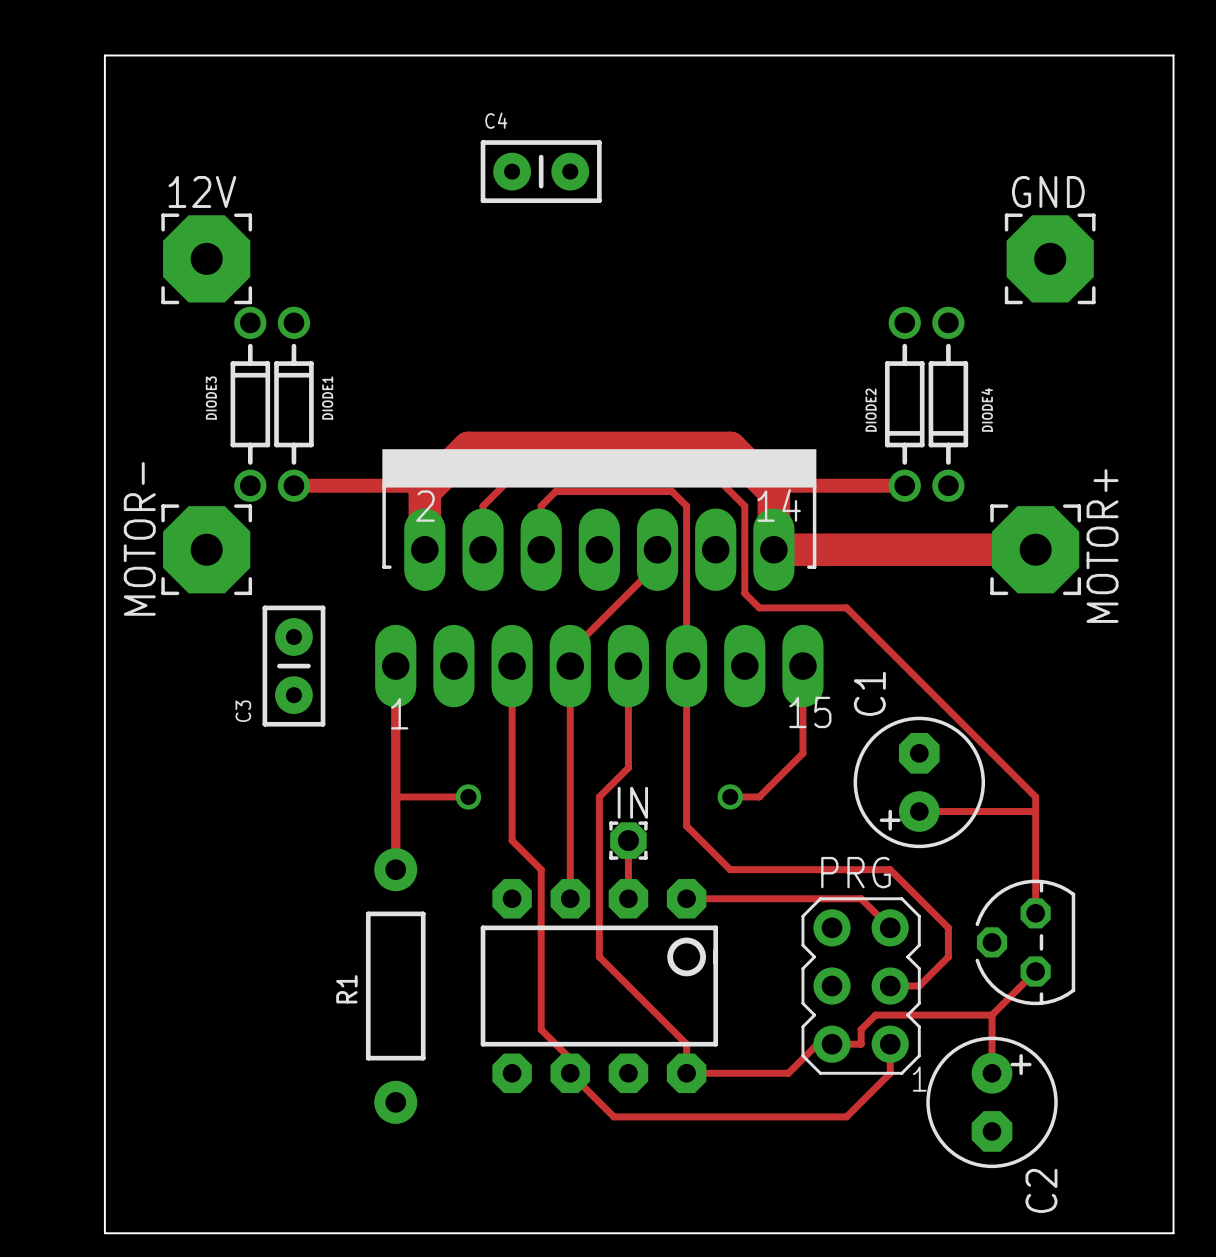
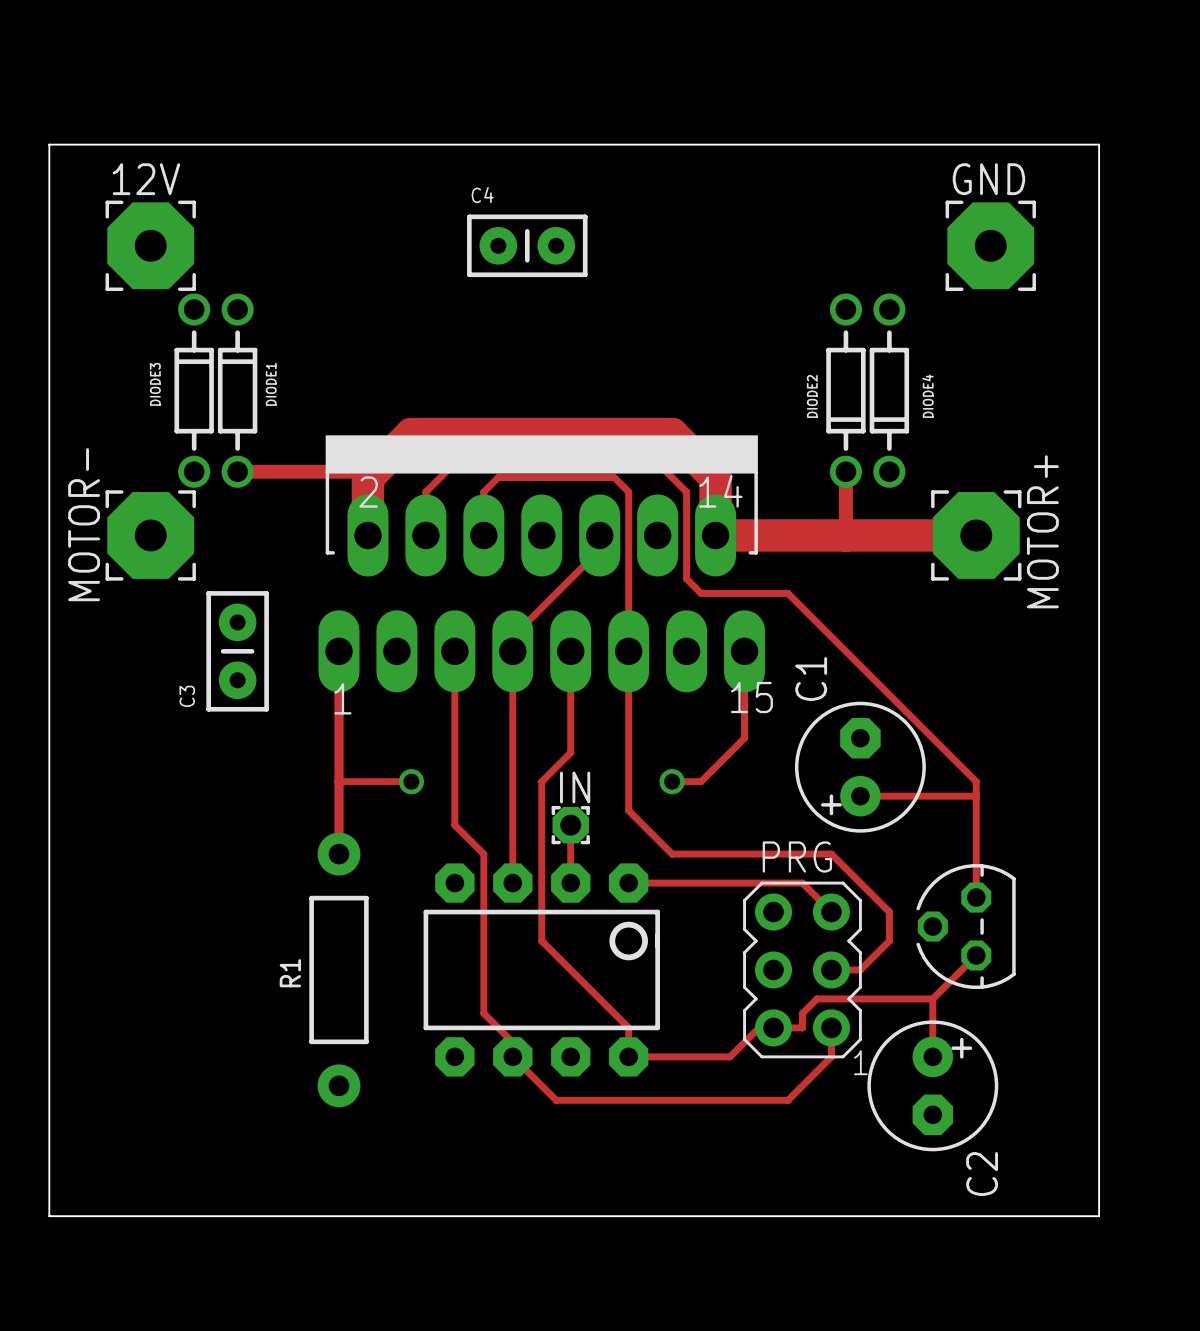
board edge: (104, 157) (104, 55) (1173, 55) (1173, 1233) (1158, 1233) -> (49, 144) (1099, 144) (1099, 1216)
C4 position: (541, 171) -> (527, 245)
track: (779, 485) (904, 485) -> (845, 535) (845, 471)

